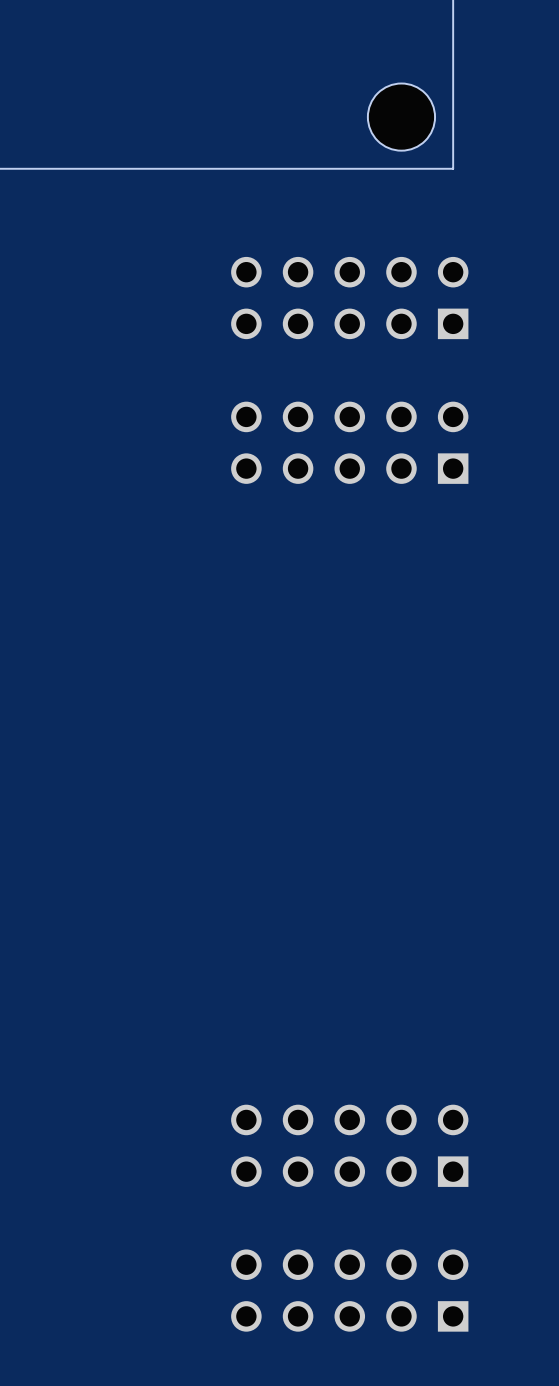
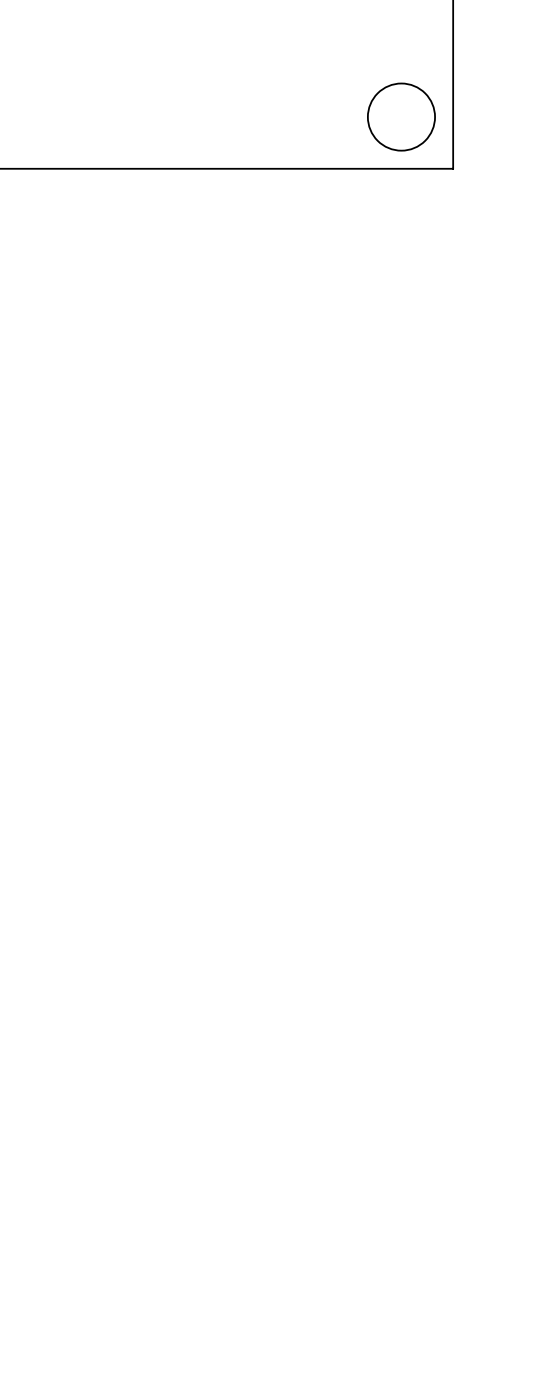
part: (349, 298) -> none
part: (349, 442) -> none
part: (349, 1145) -> none
part: (349, 1290) -> none

